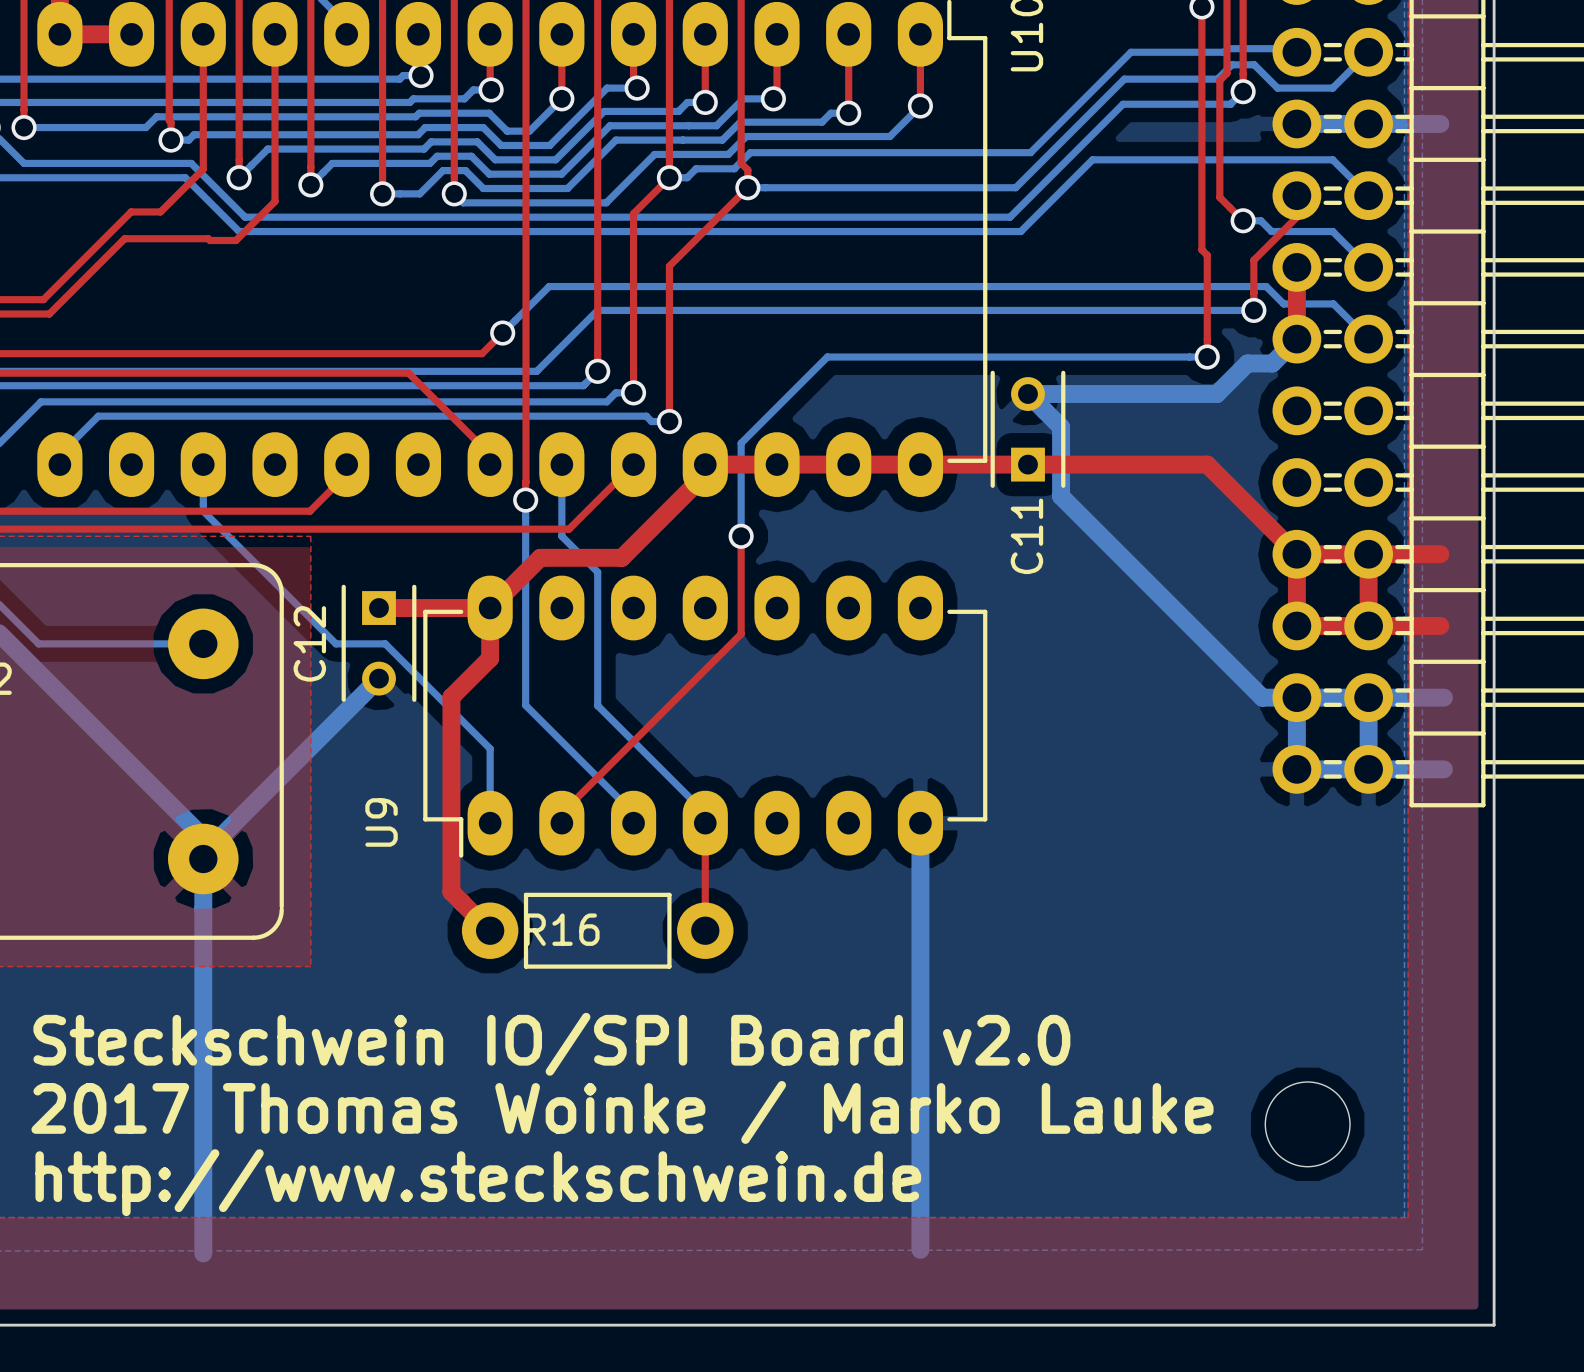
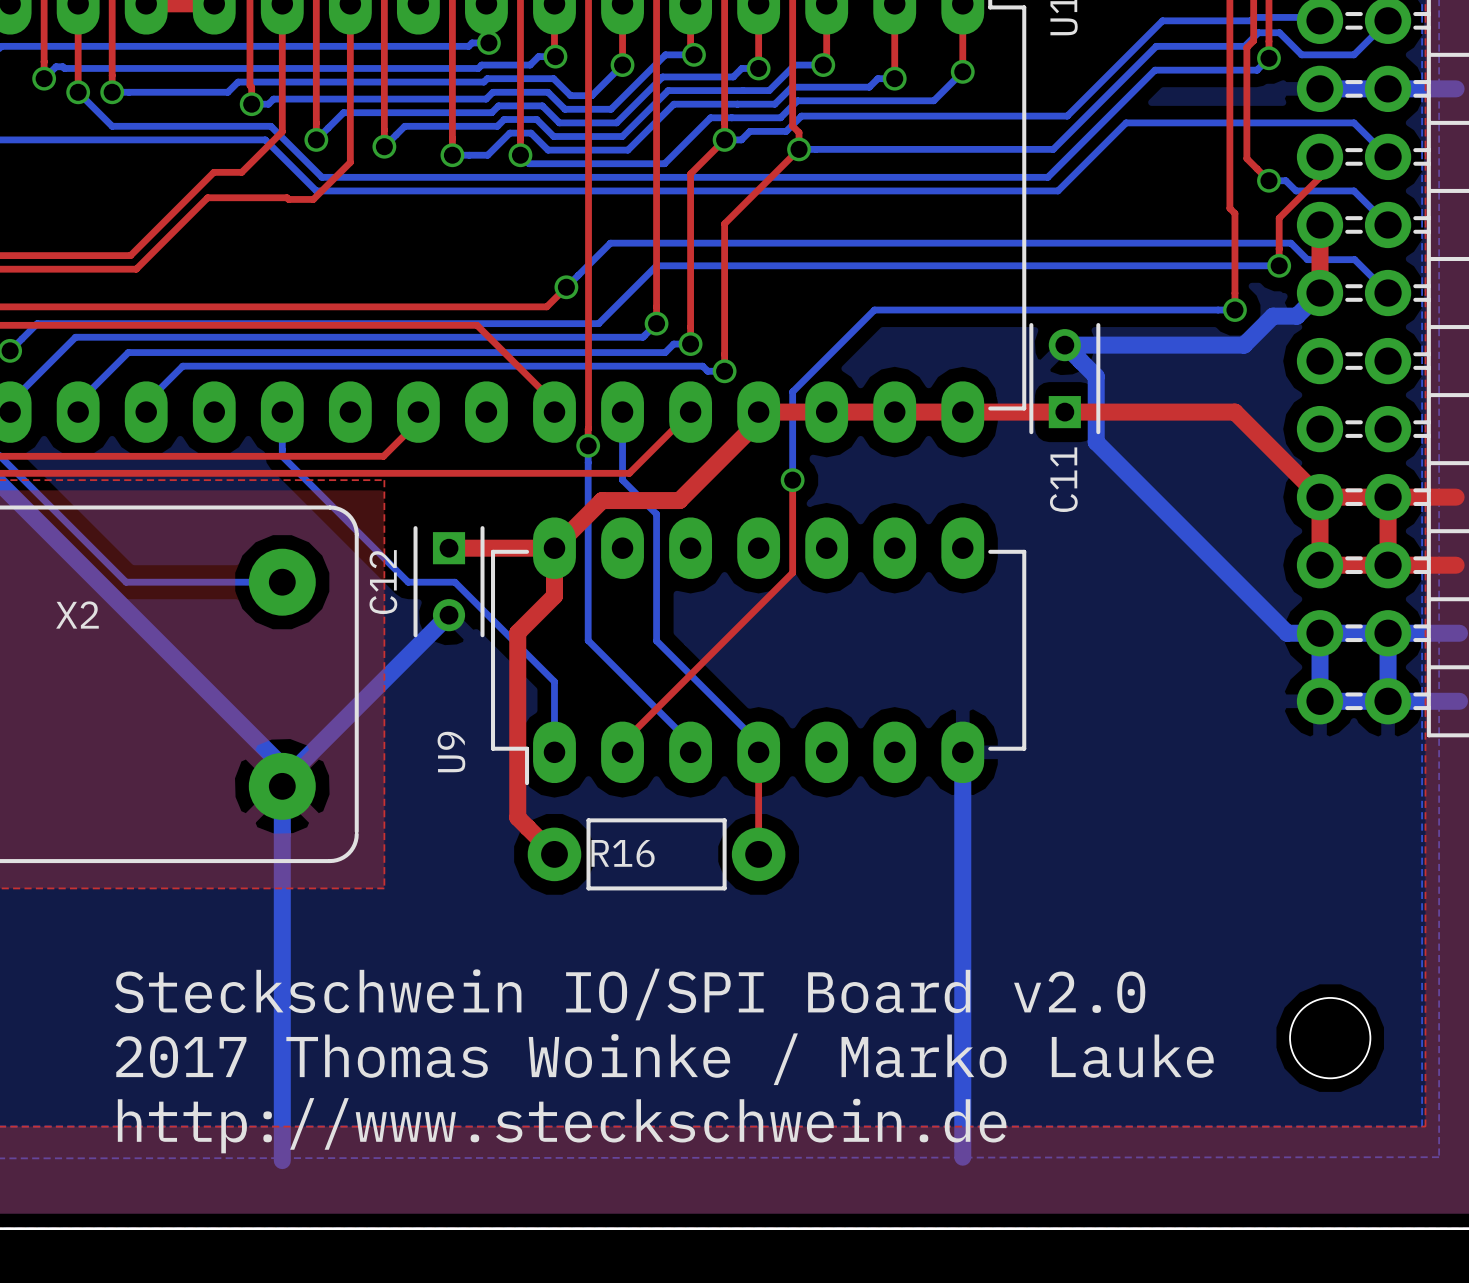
text position: Steckschwein IO/SPI Board v2.0 (551, 1044) -> Steckschwein IO/SPI Board v2.0 (630, 994)
text position: 2017 Thomas Woinke / Marko Lauke (622, 1112) -> 2017 Thomas Woinke / Marko Lauke (664, 1059)
text position: http://www.steckschwein.de (478, 1182) -> http://www.steckschwein.de (562, 1125)

